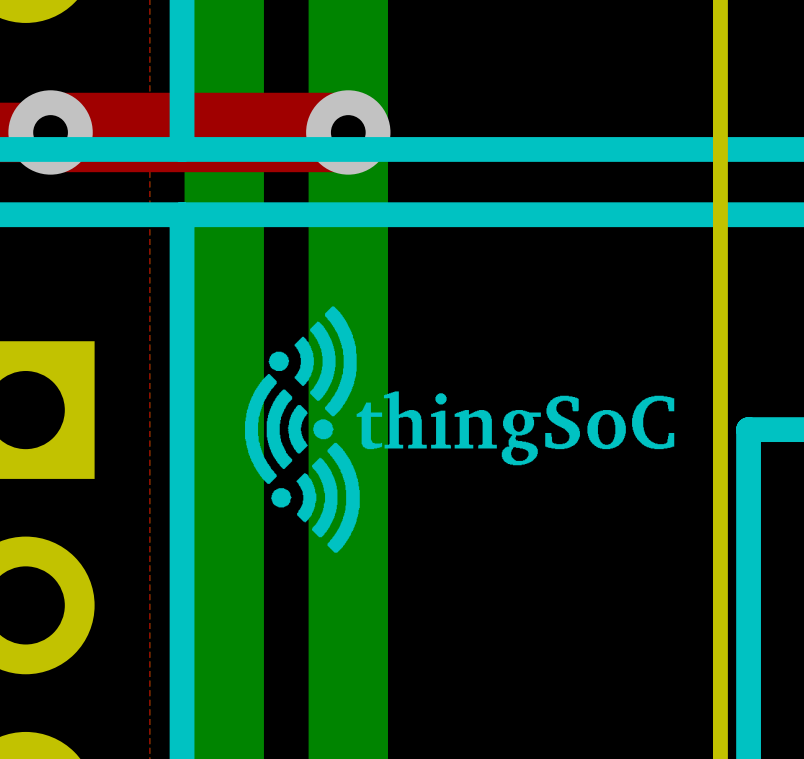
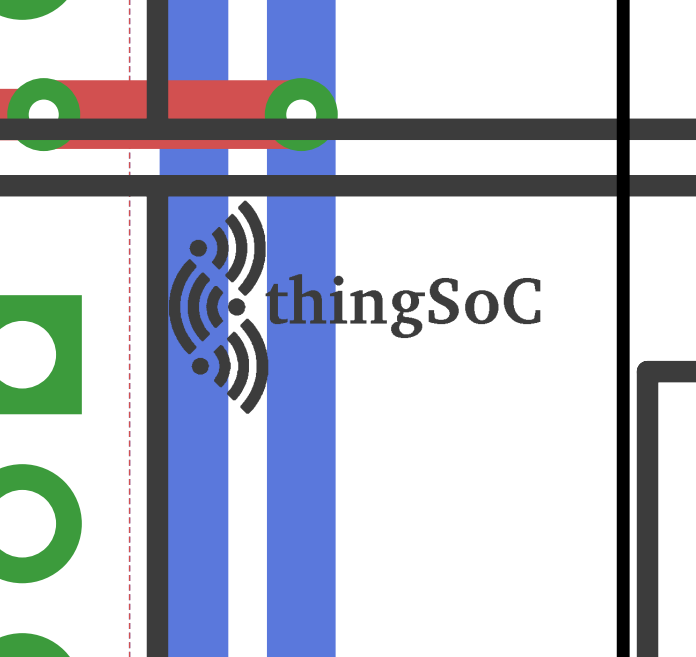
drawing position: (459, 429) -> (354, 307)

